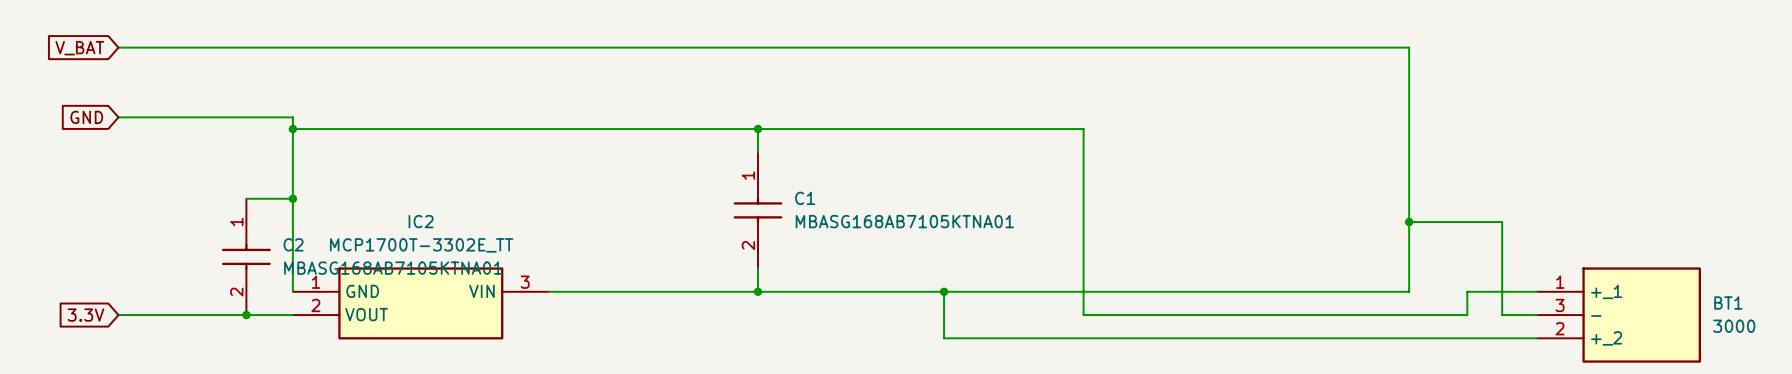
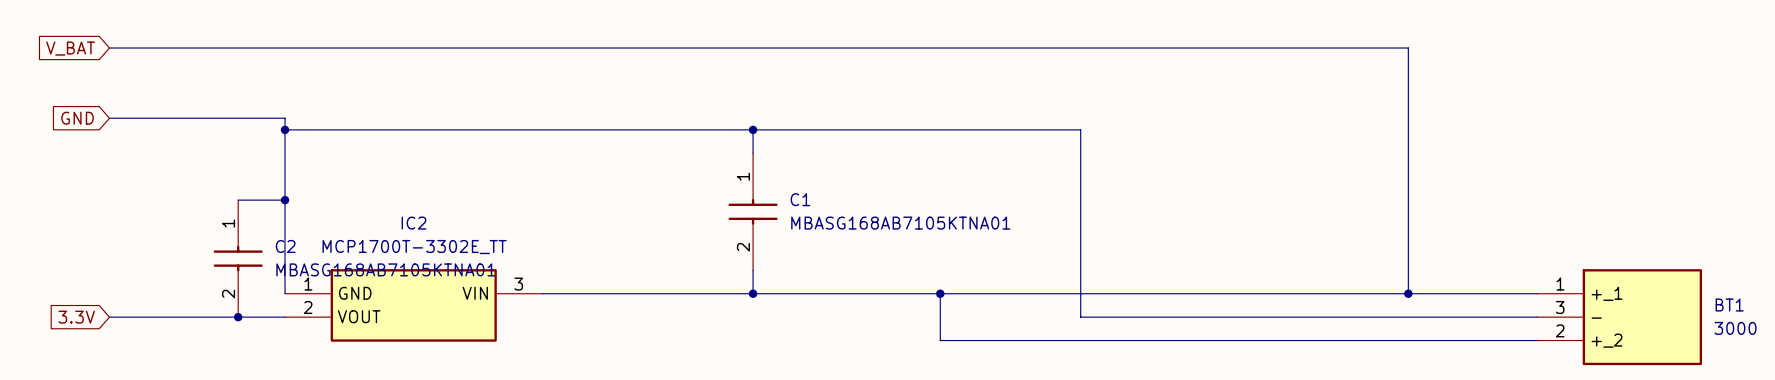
wire: (1409, 222) (1502, 222) (1502, 315) -> none
junction: (1409, 222) -> none
wire: none -> (1408, 293) (1466, 293)
junction: none -> (1408, 293)
wire: (1467, 291) (1467, 315) -> (1501, 317) (1466, 317)

